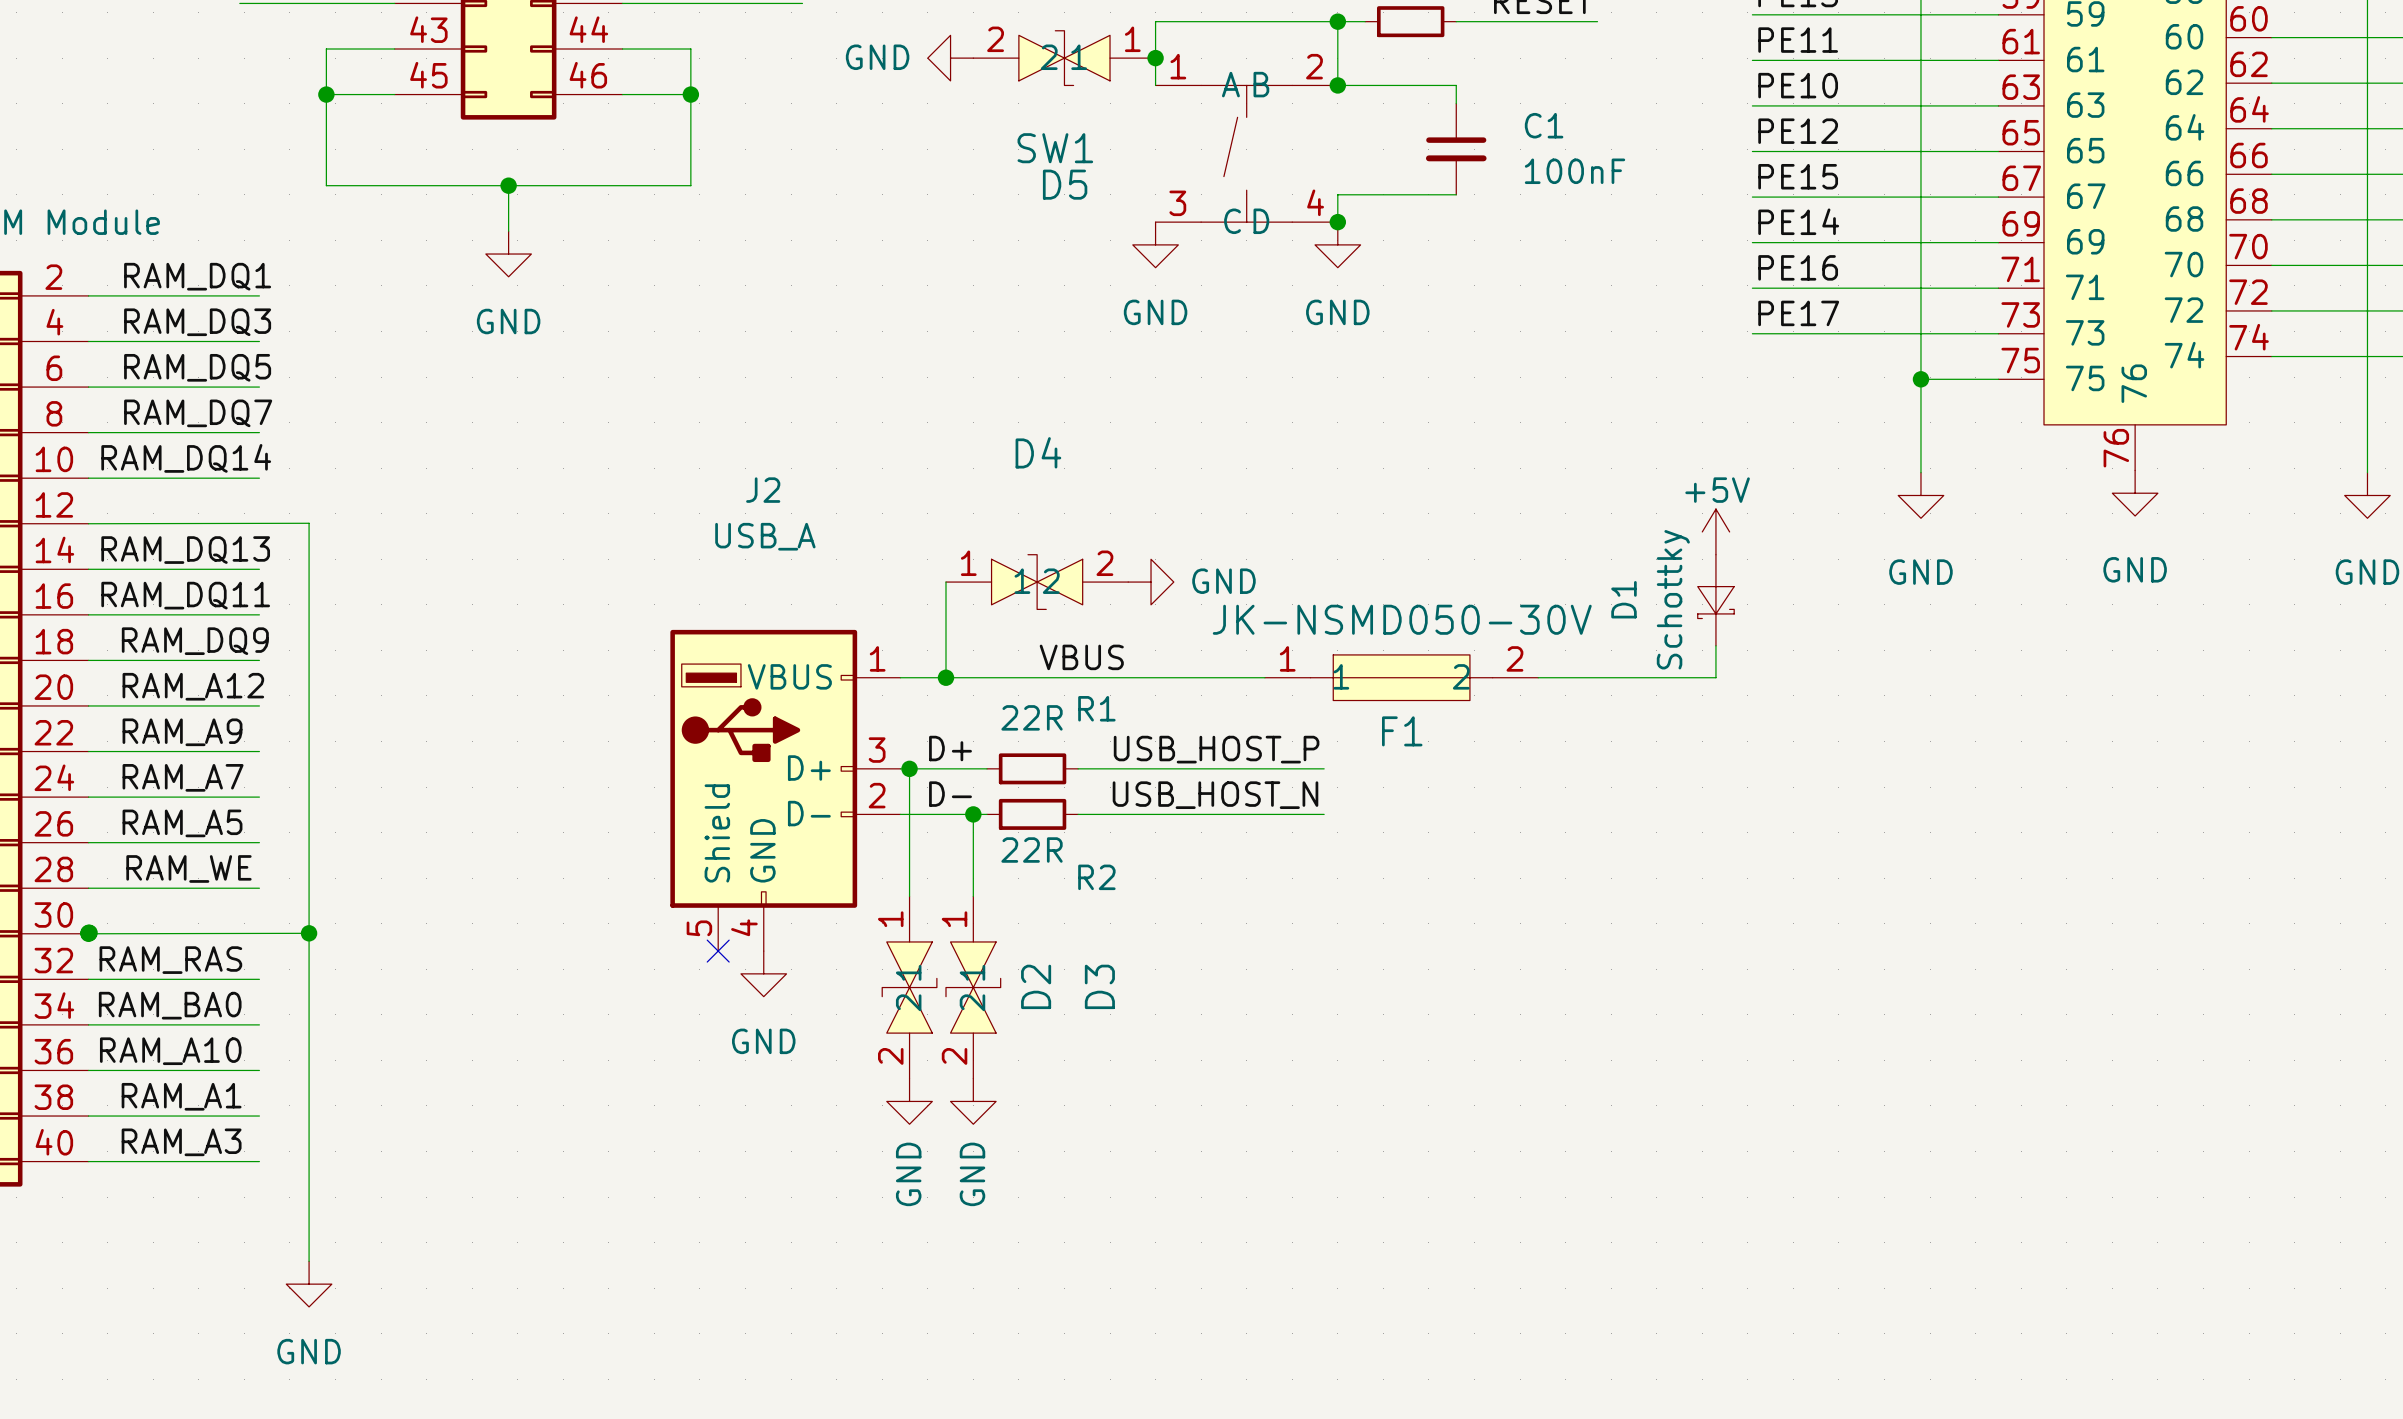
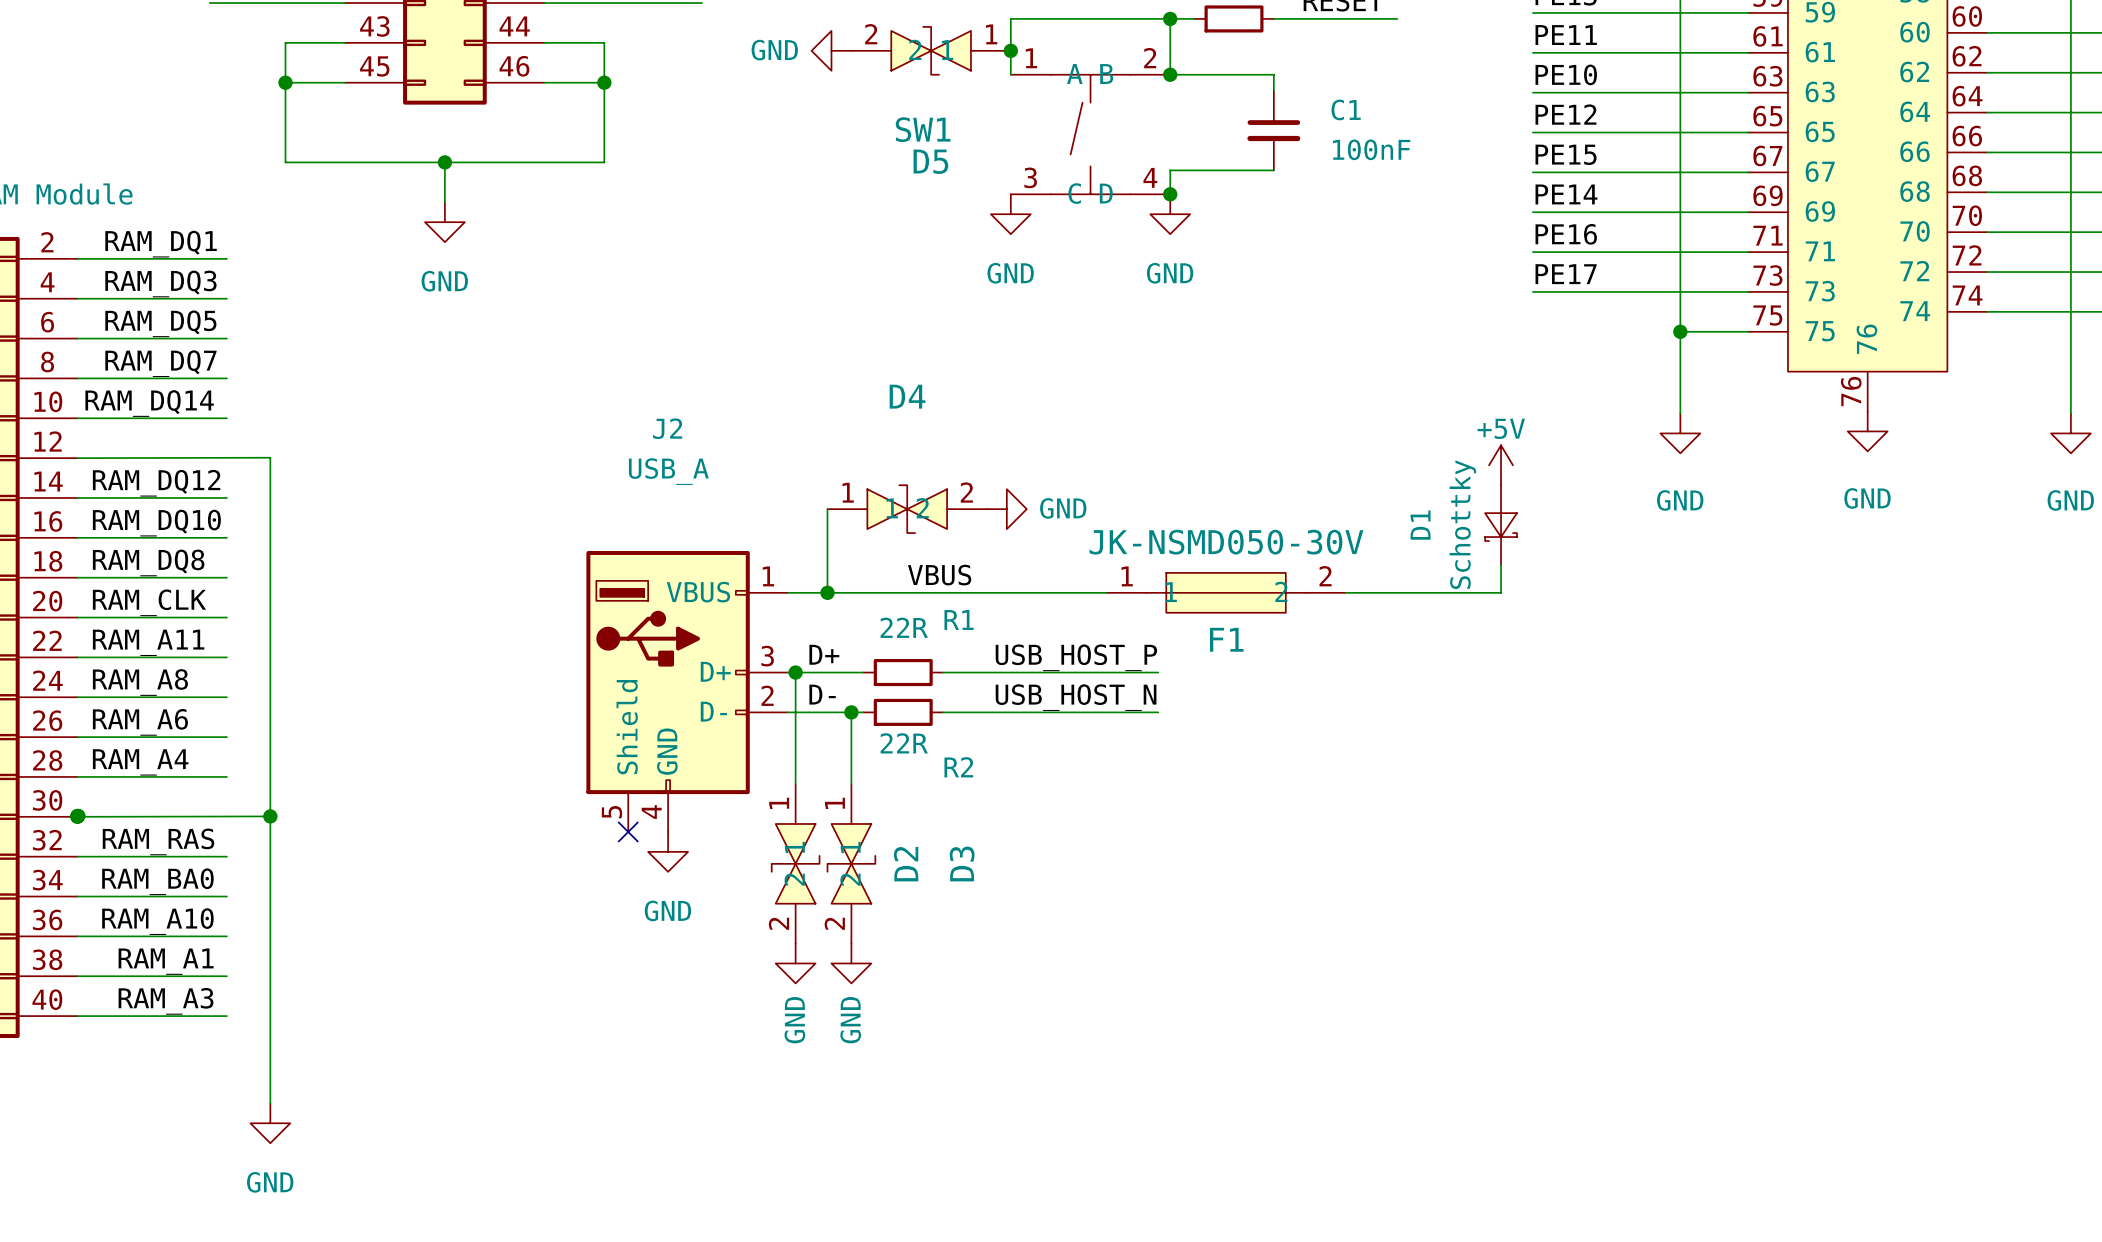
label: RAM_DQ13 (185, 550) -> RAM_DQ12 (156, 483)
label: RAM_DQ11 (185, 595) -> RAM_DQ10 (156, 523)
label: RAM_DQ9 (195, 641) -> RAM_DQ8 (148, 562)
label: RAM_A12 (193, 686) -> RAM_CLK (149, 602)
label: RAM_A9 (182, 732) -> RAM_A11 (148, 642)
label: RAM_A7 (183, 777) -> RAM_A8 (140, 682)
label: RAM_A5 (182, 823) -> RAM_A6 (140, 722)
label: RAM_WE (188, 868) -> RAM_A4 (140, 762)

